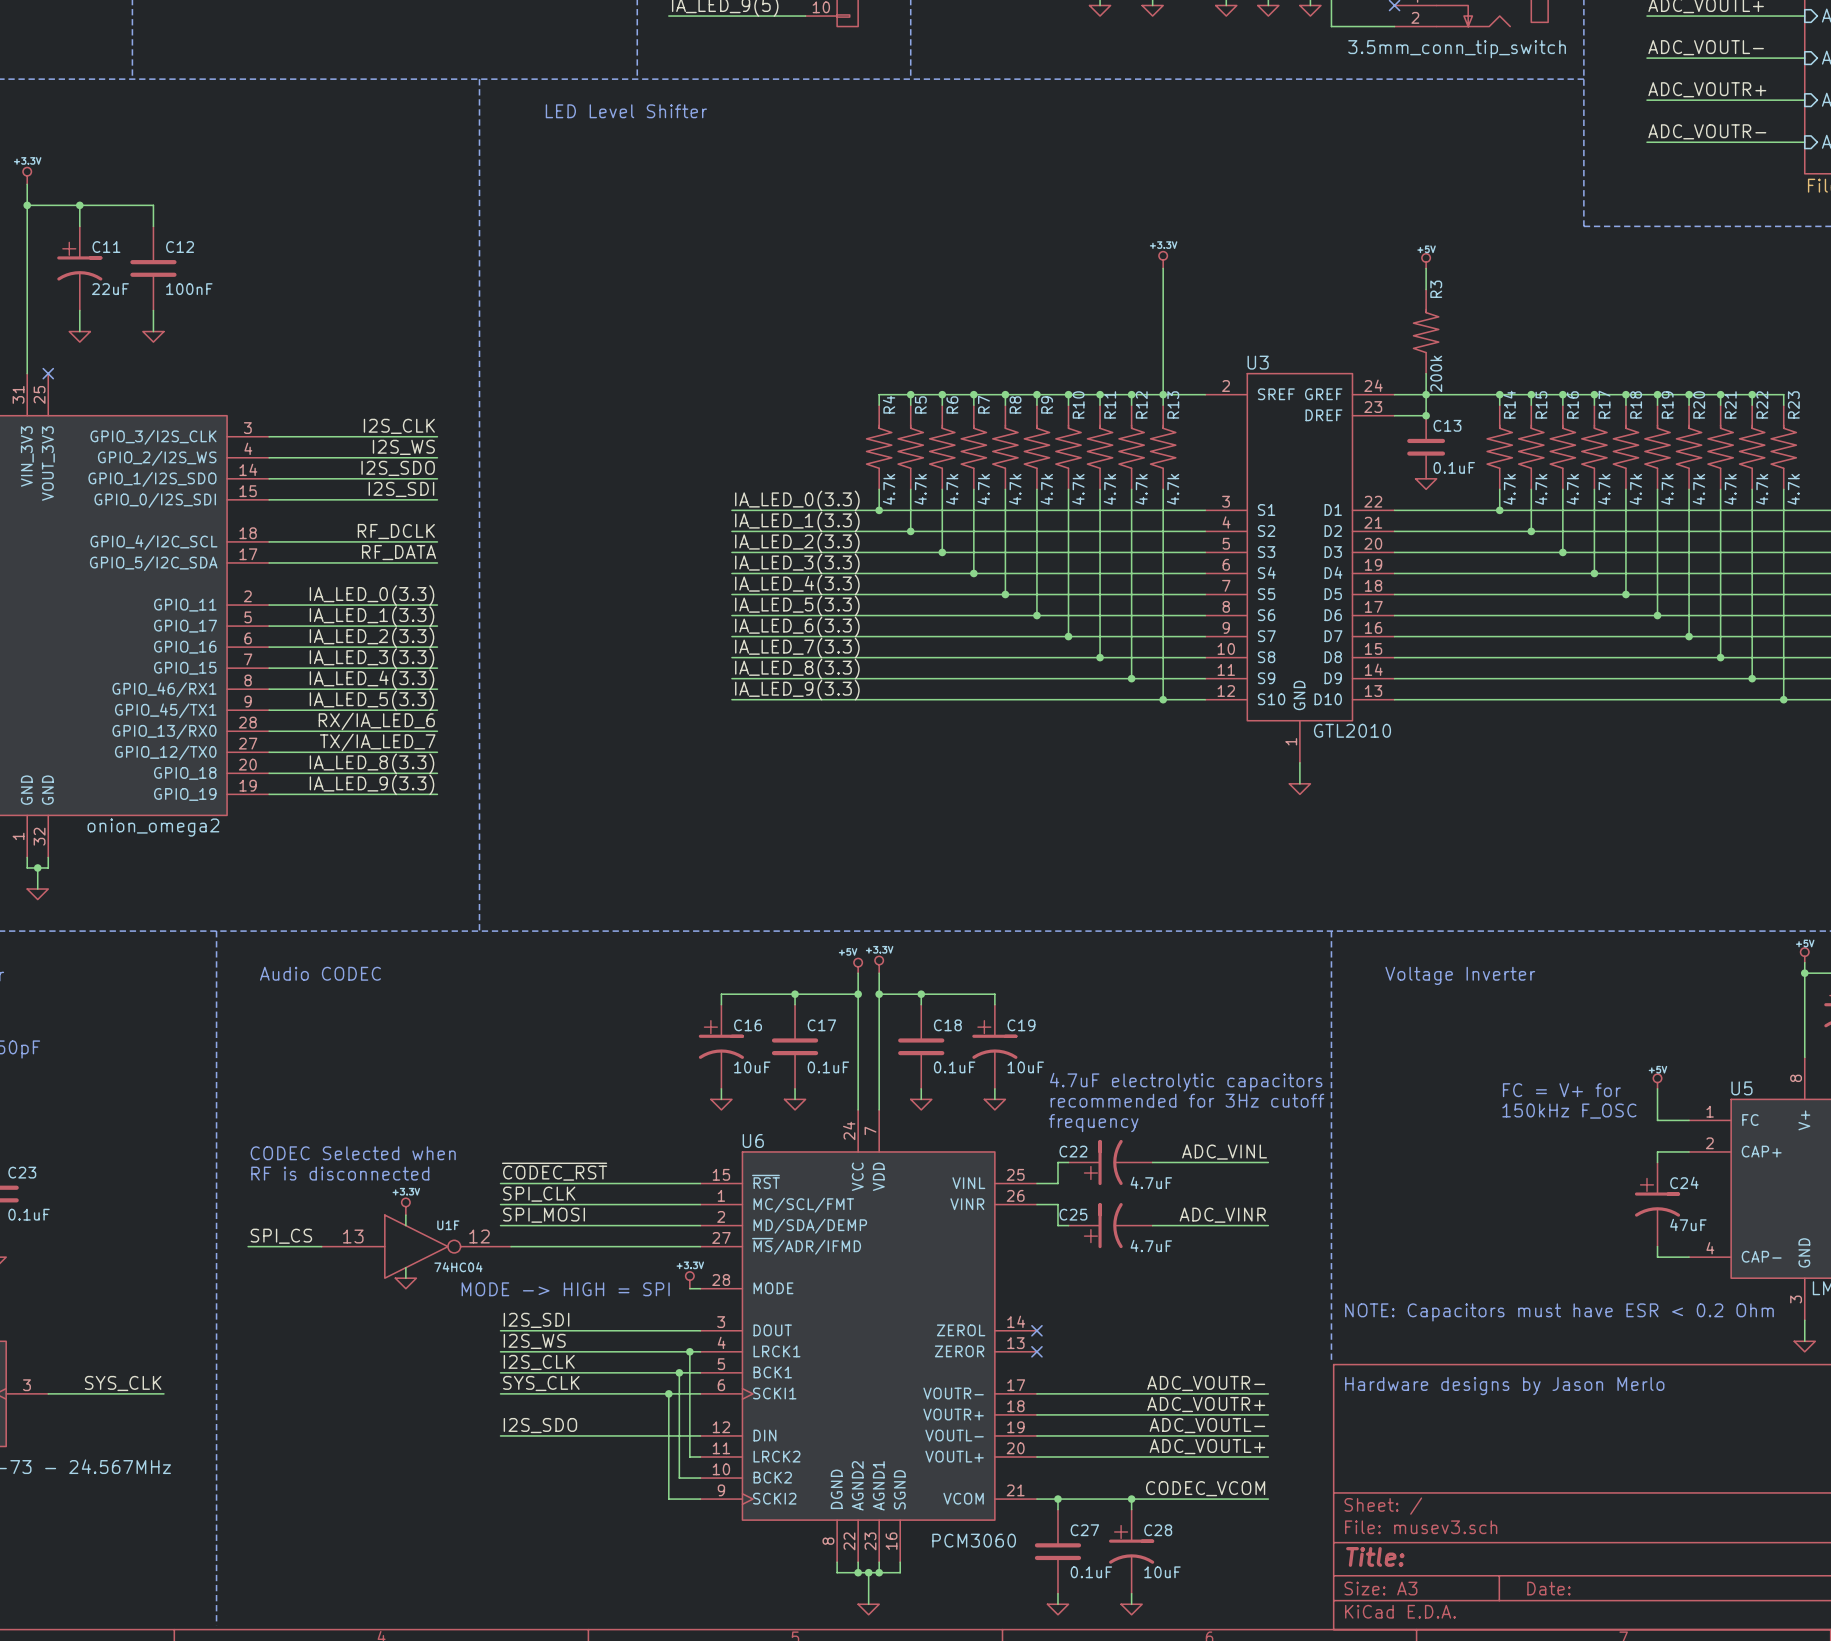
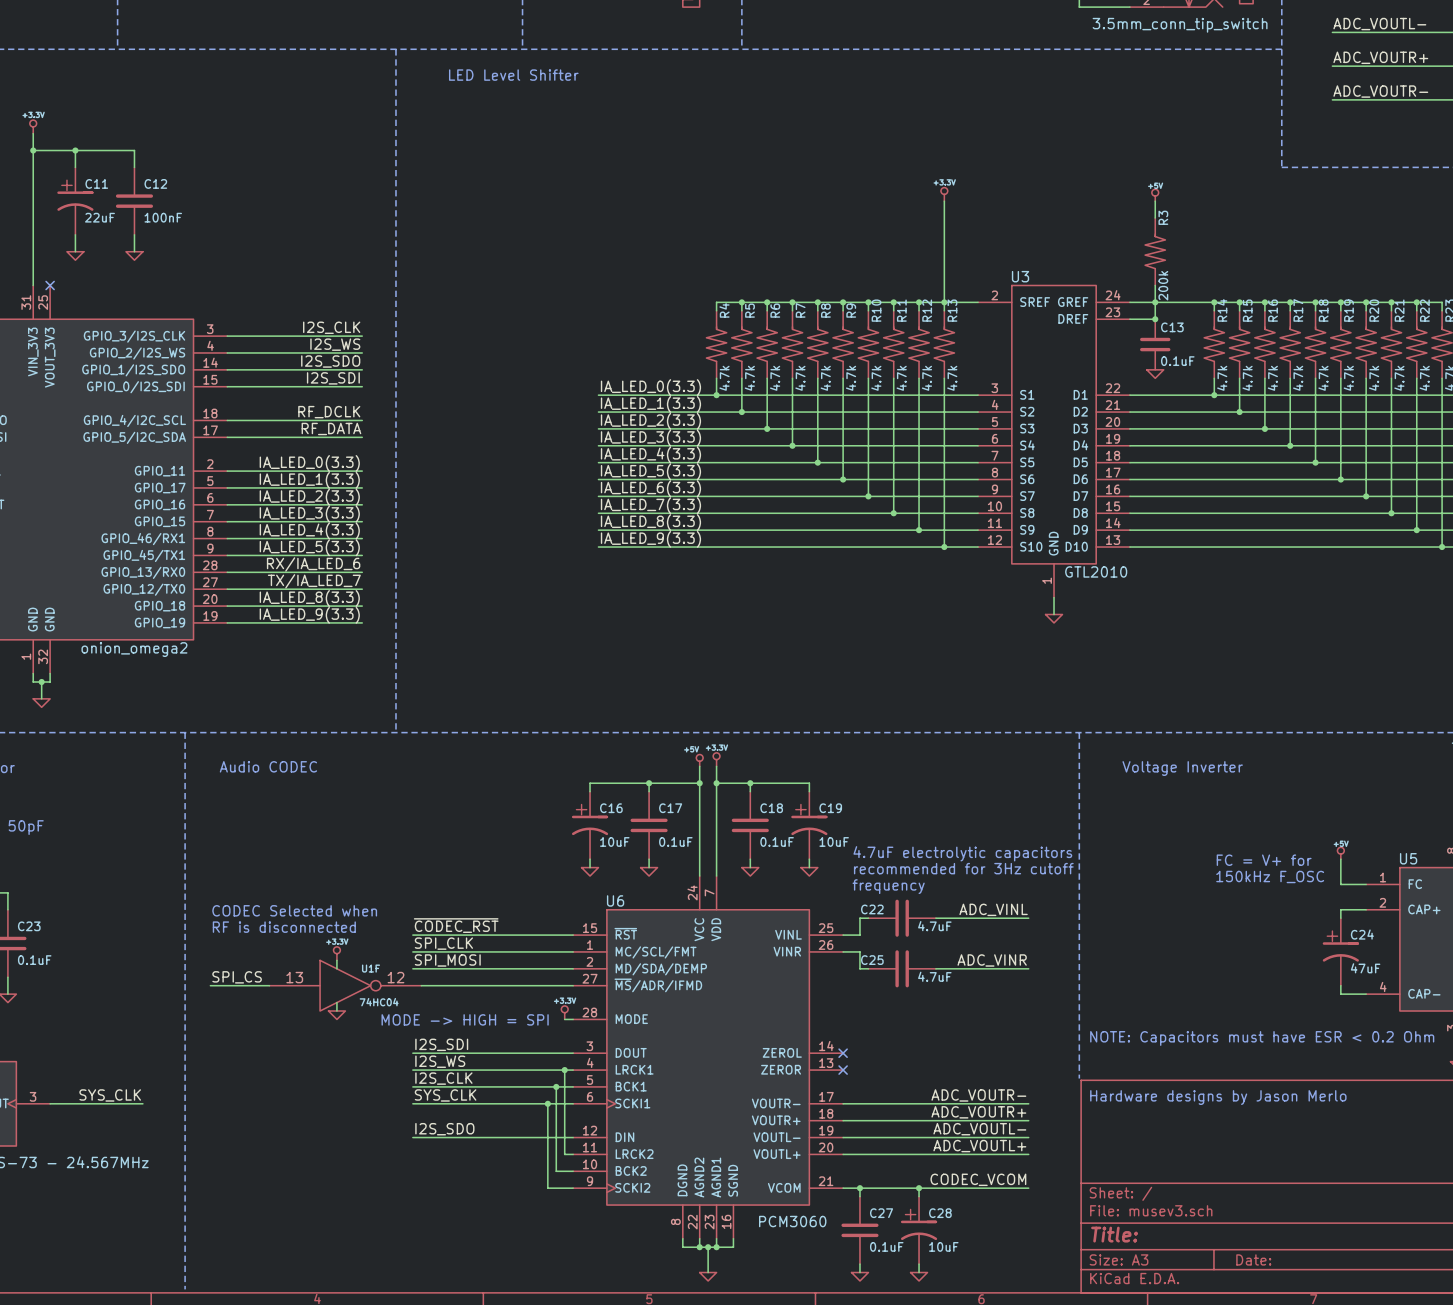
C22 symbol: [1068, 1139, 1153, 1186] -> [868, 899, 936, 937]
C25 symbol: [1068, 1202, 1153, 1249] -> [868, 950, 936, 988]

